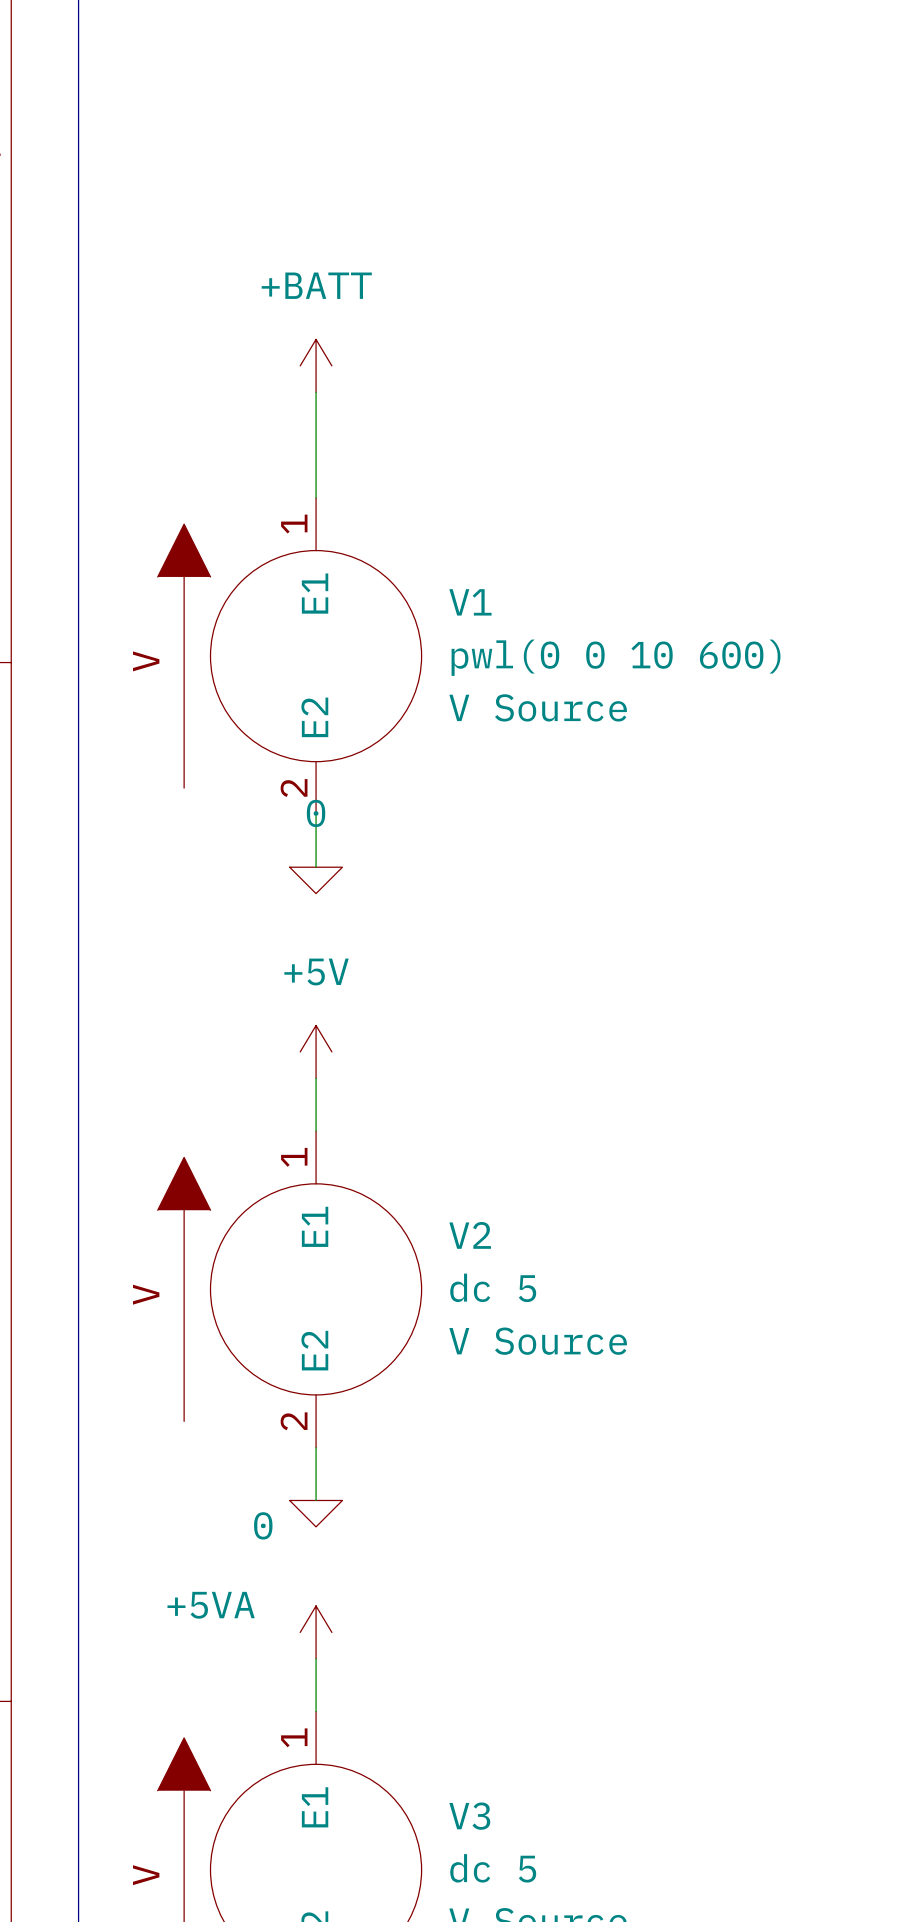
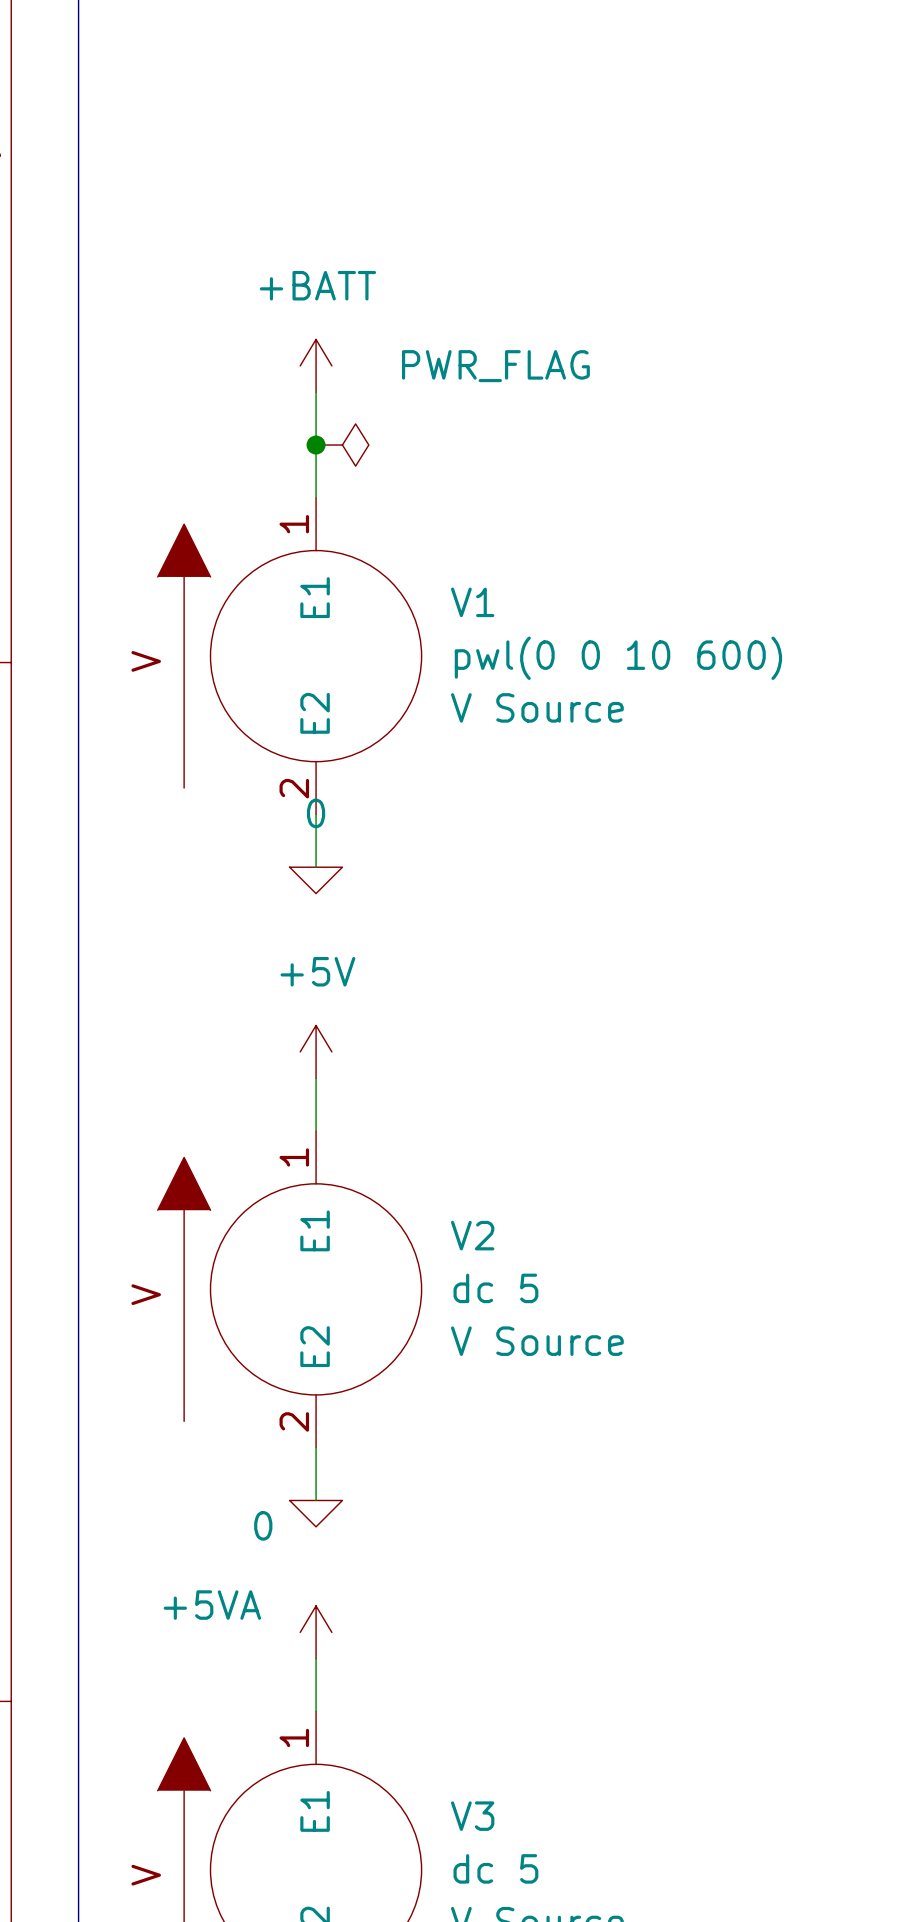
junction: none -> (316, 445)
power symbol: none -> PWR_FLAG (342, 445)

